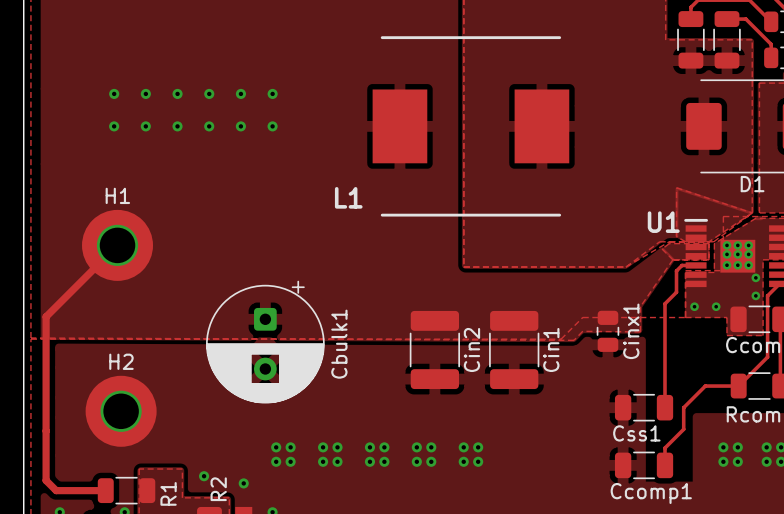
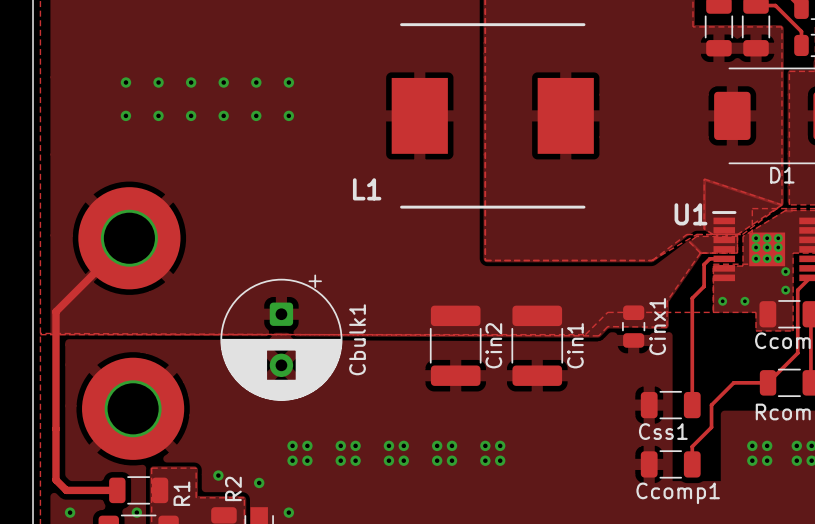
H1: (117, 245) -> none
part: none -> (129, 238)
H2: (121, 411) -> none
part: none -> (133, 408)

